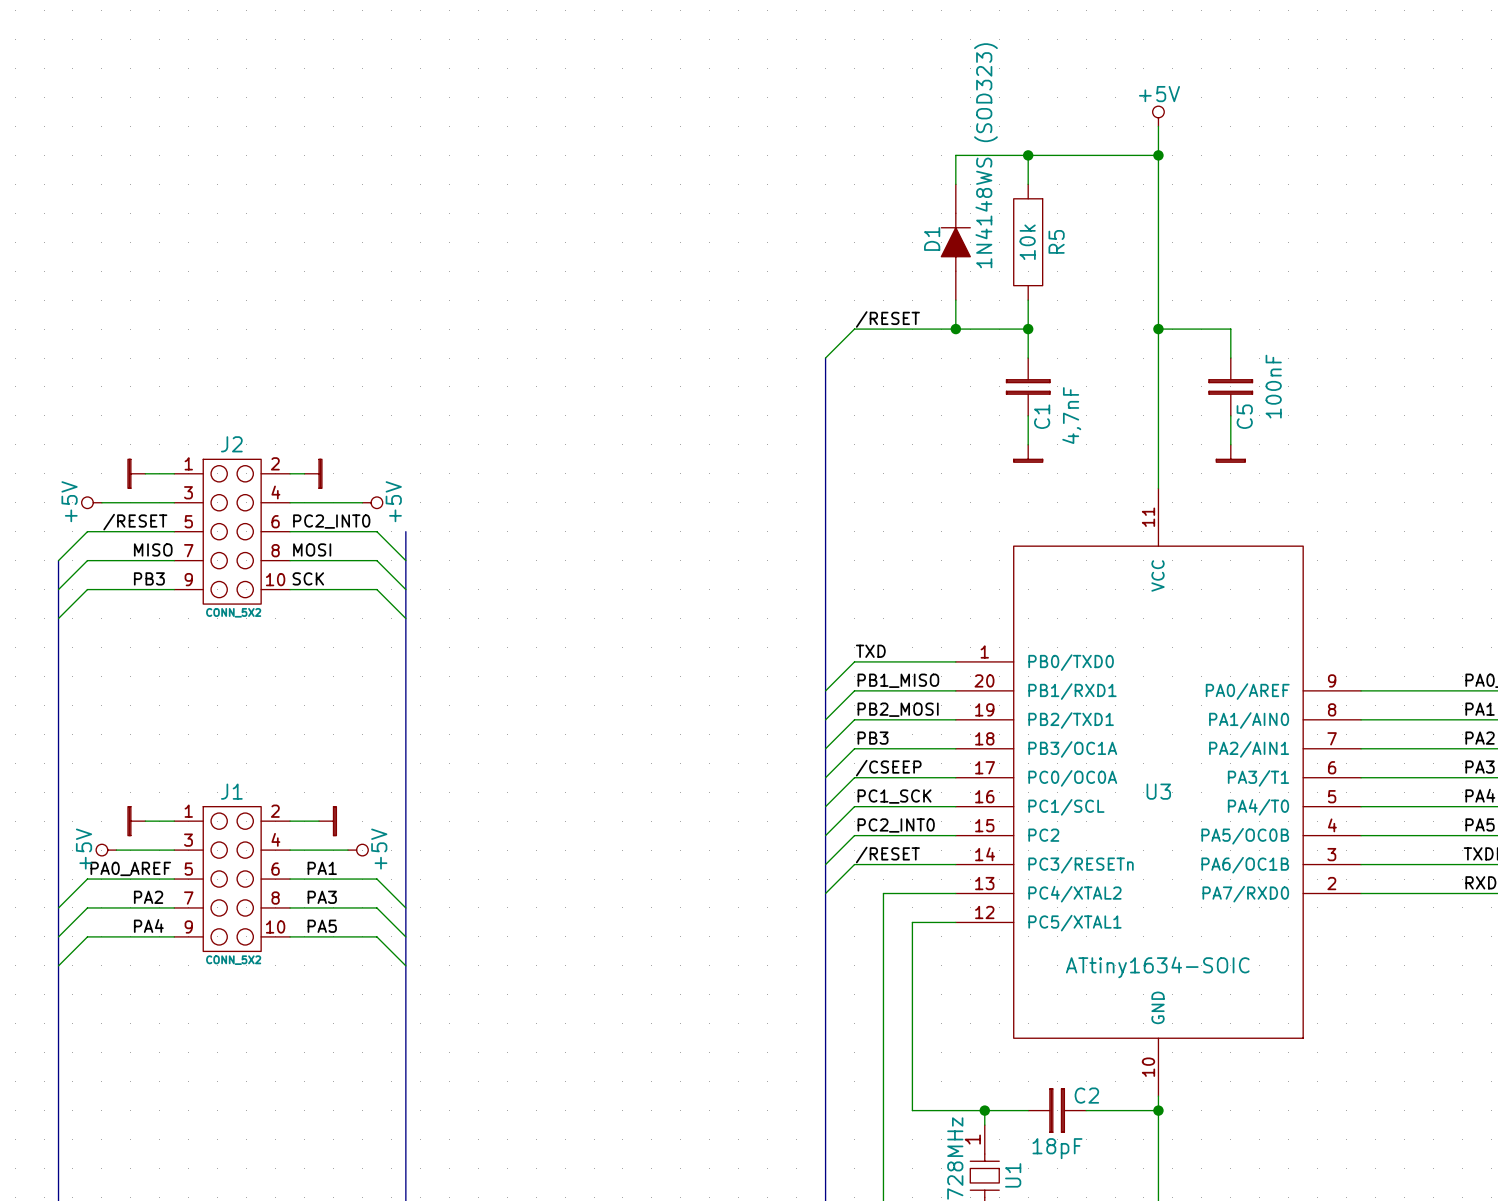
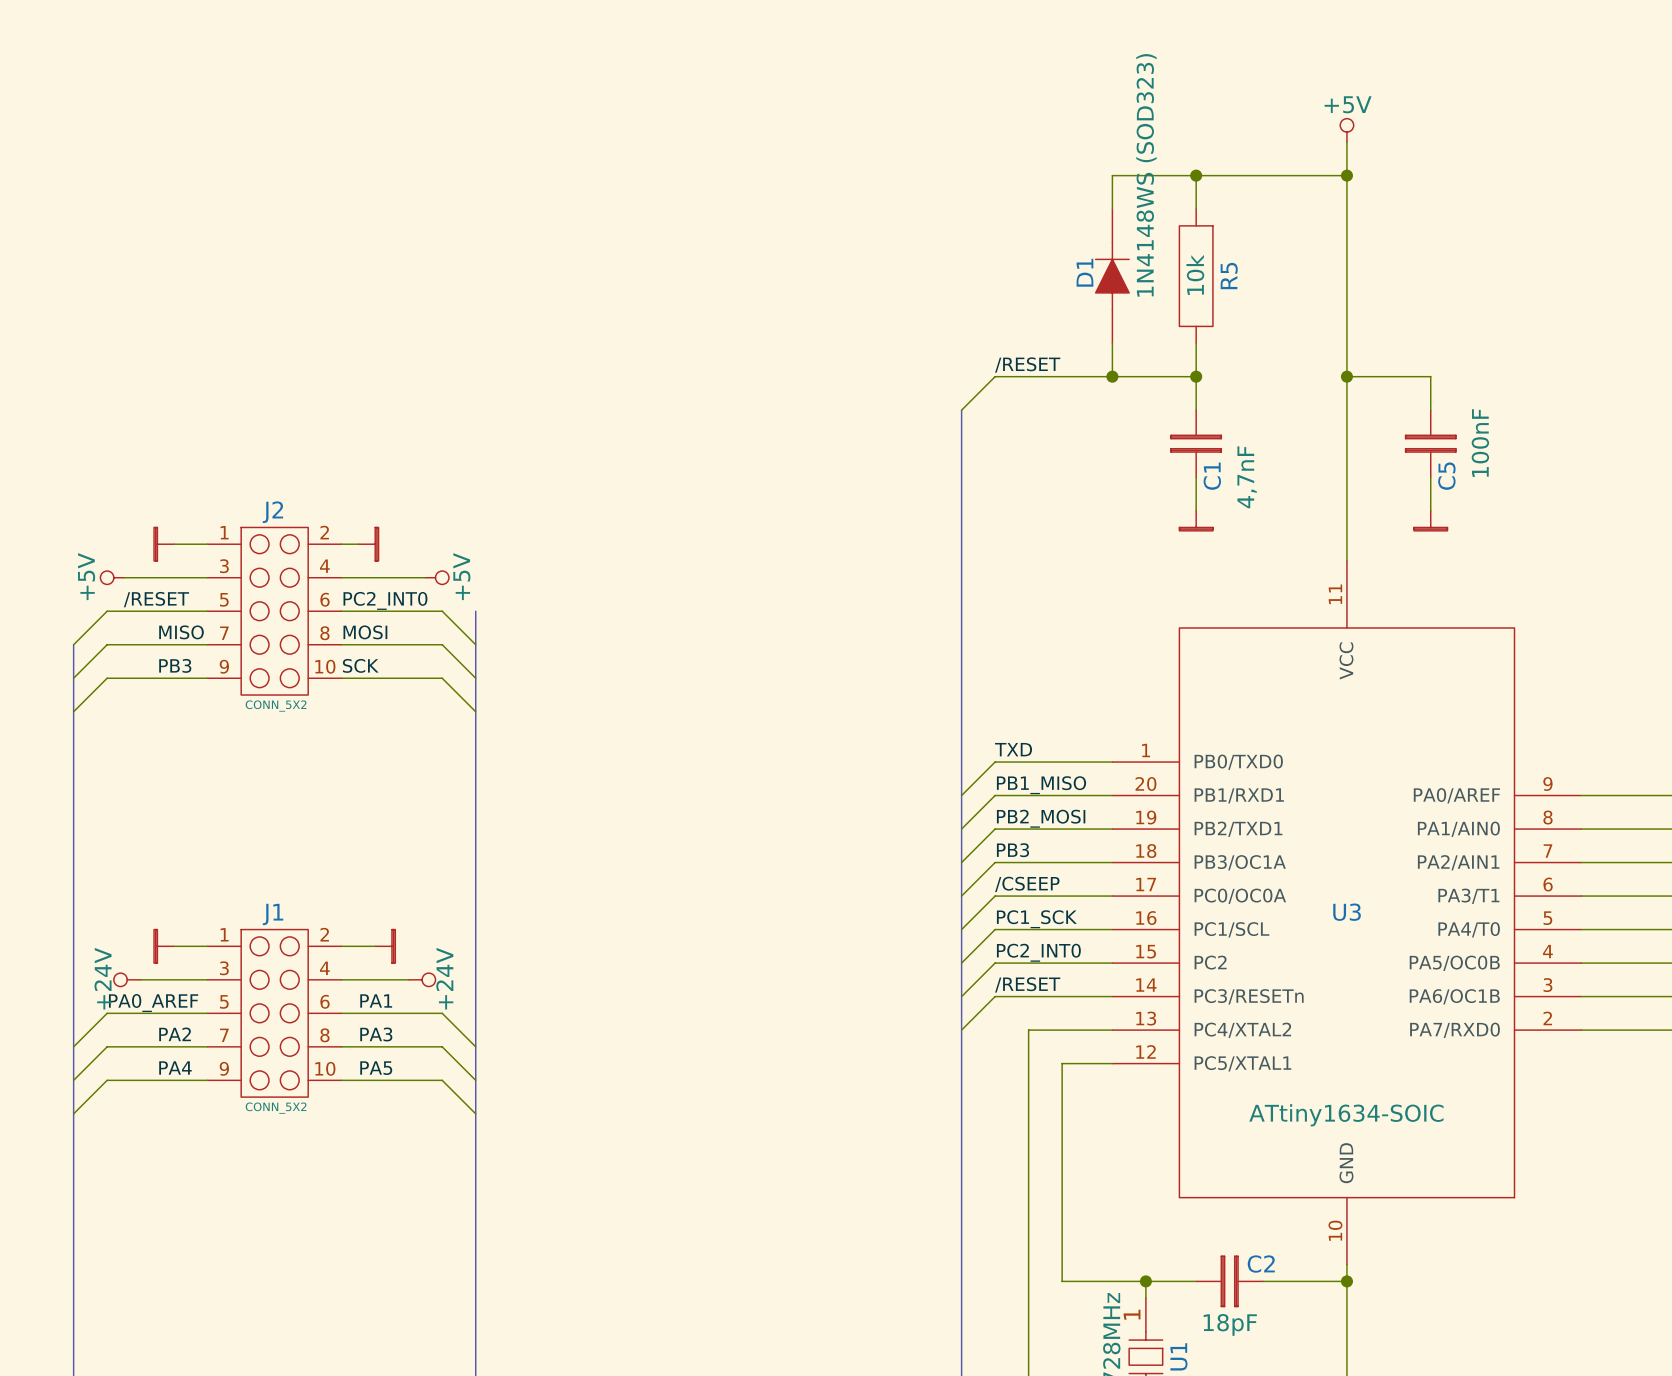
power symbol: +5V (106, 850) -> +24V (127, 979)
power symbol: +5V (358, 850) -> +24V (422, 979)

